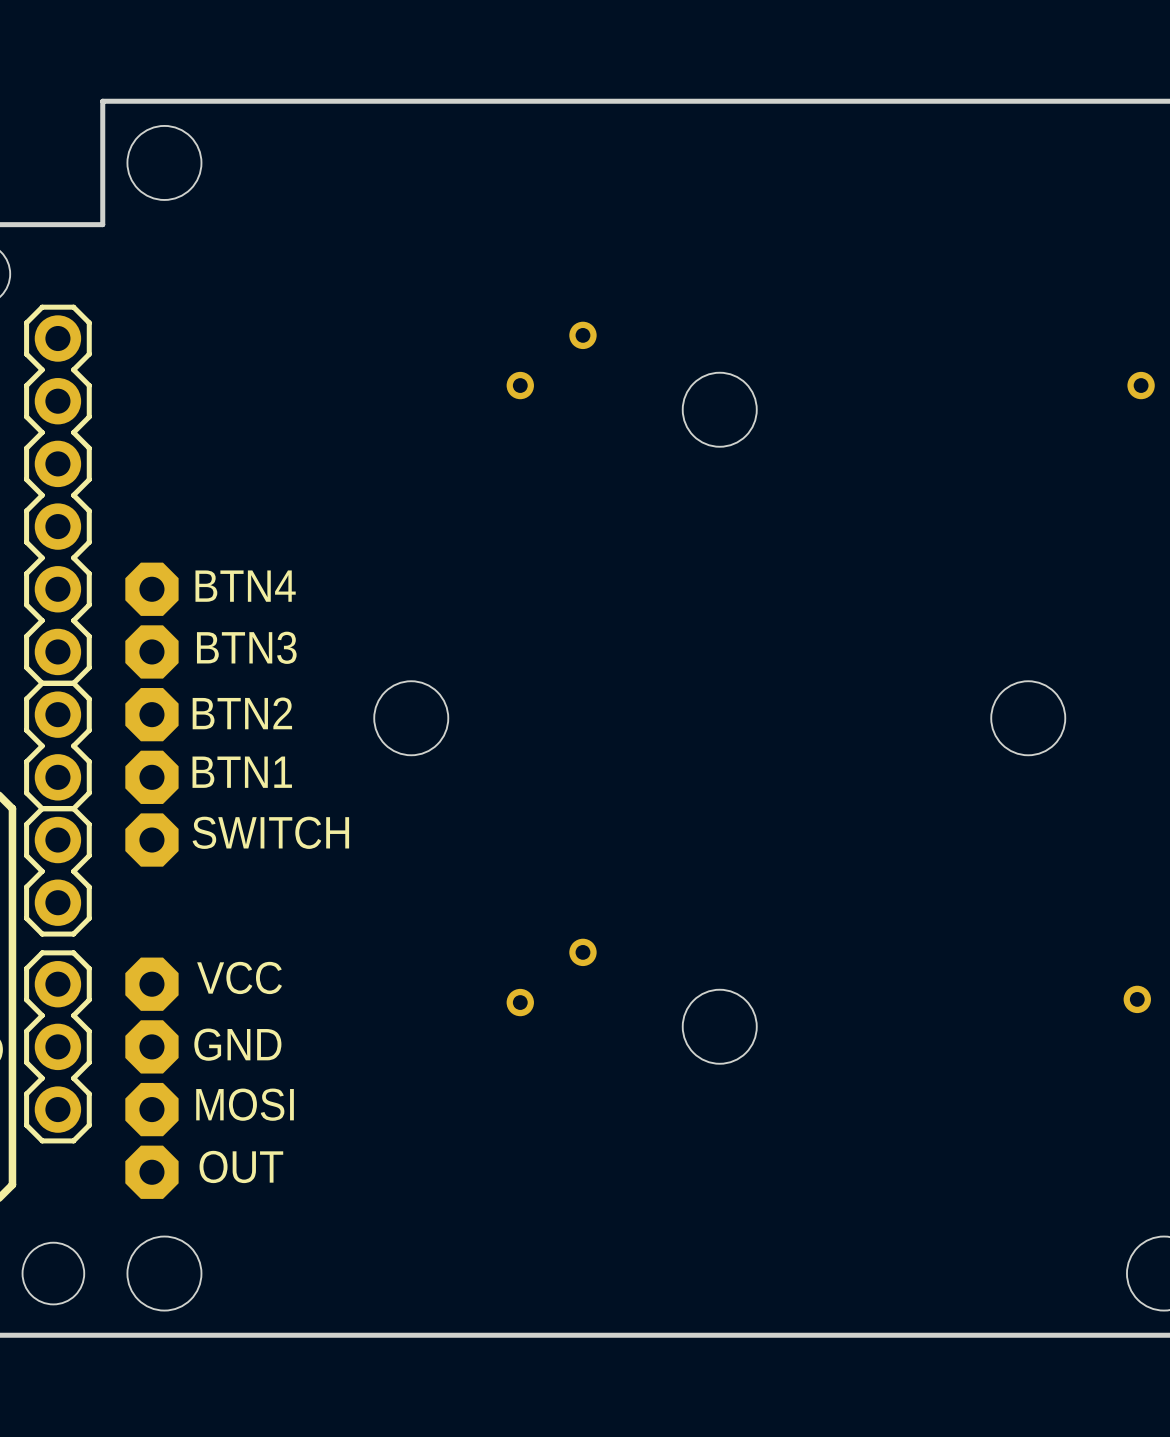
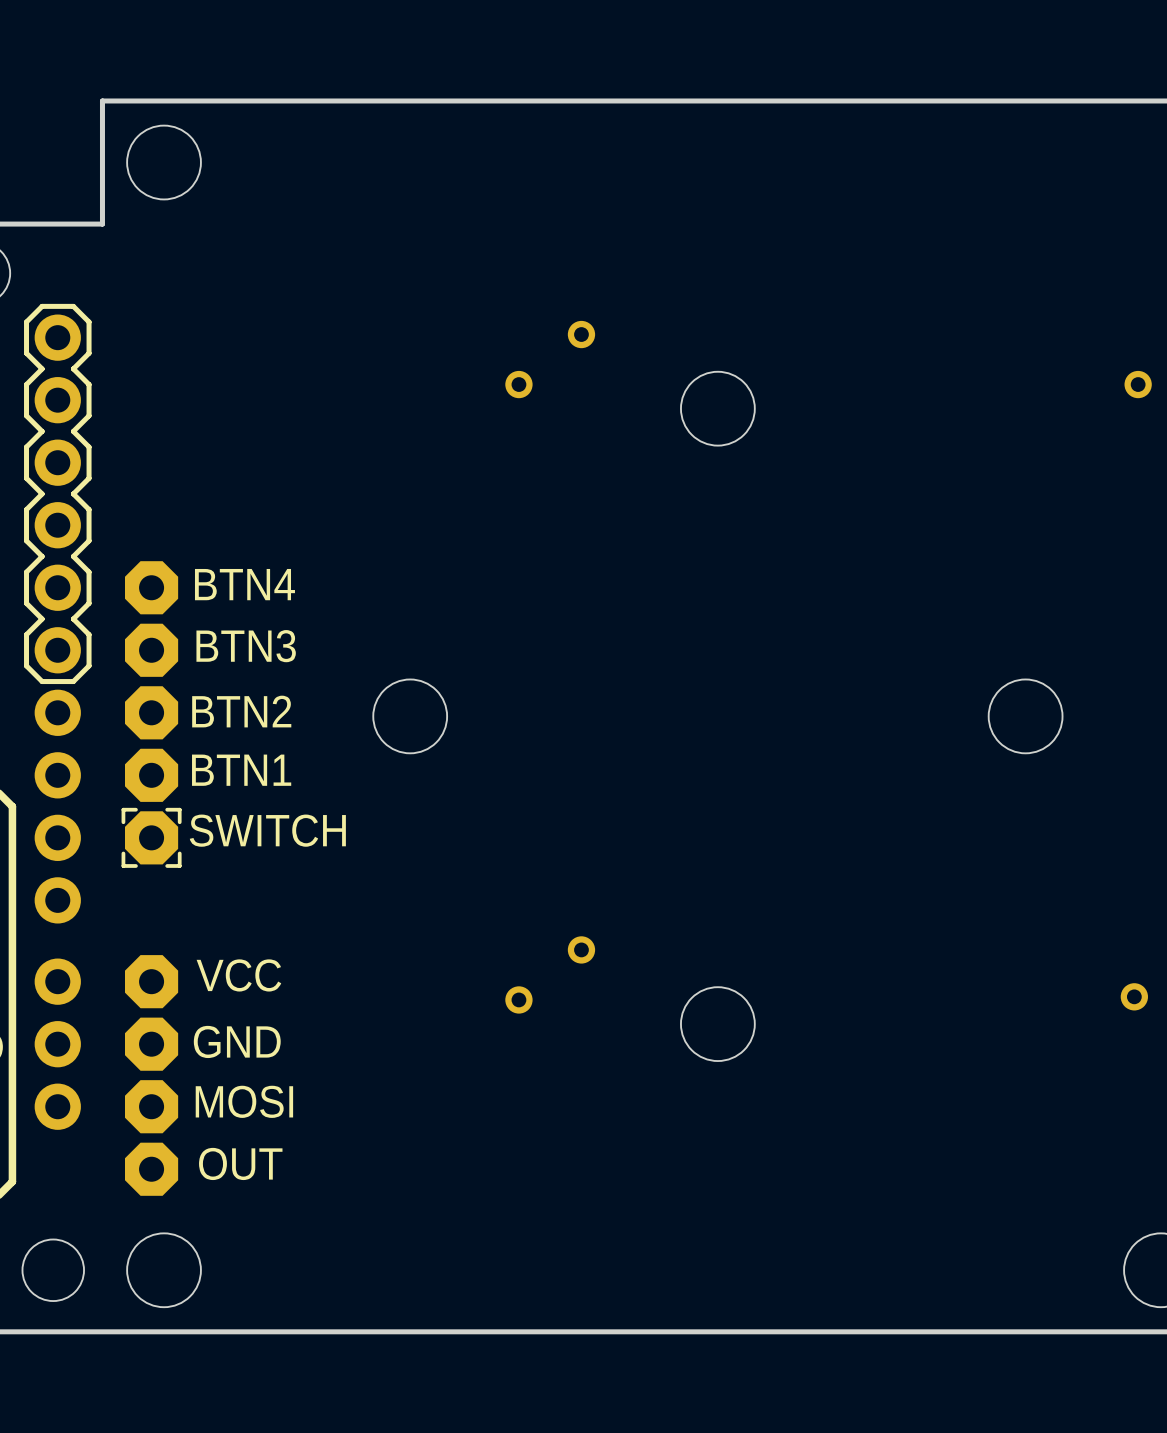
part side: bottom (57, 745) -> top (57, 744)
SWITCH side: top (151, 840) -> bottom (151, 837)
part side: bottom (57, 871) -> top (57, 869)
part side: bottom (57, 1046) -> top (57, 1044)

